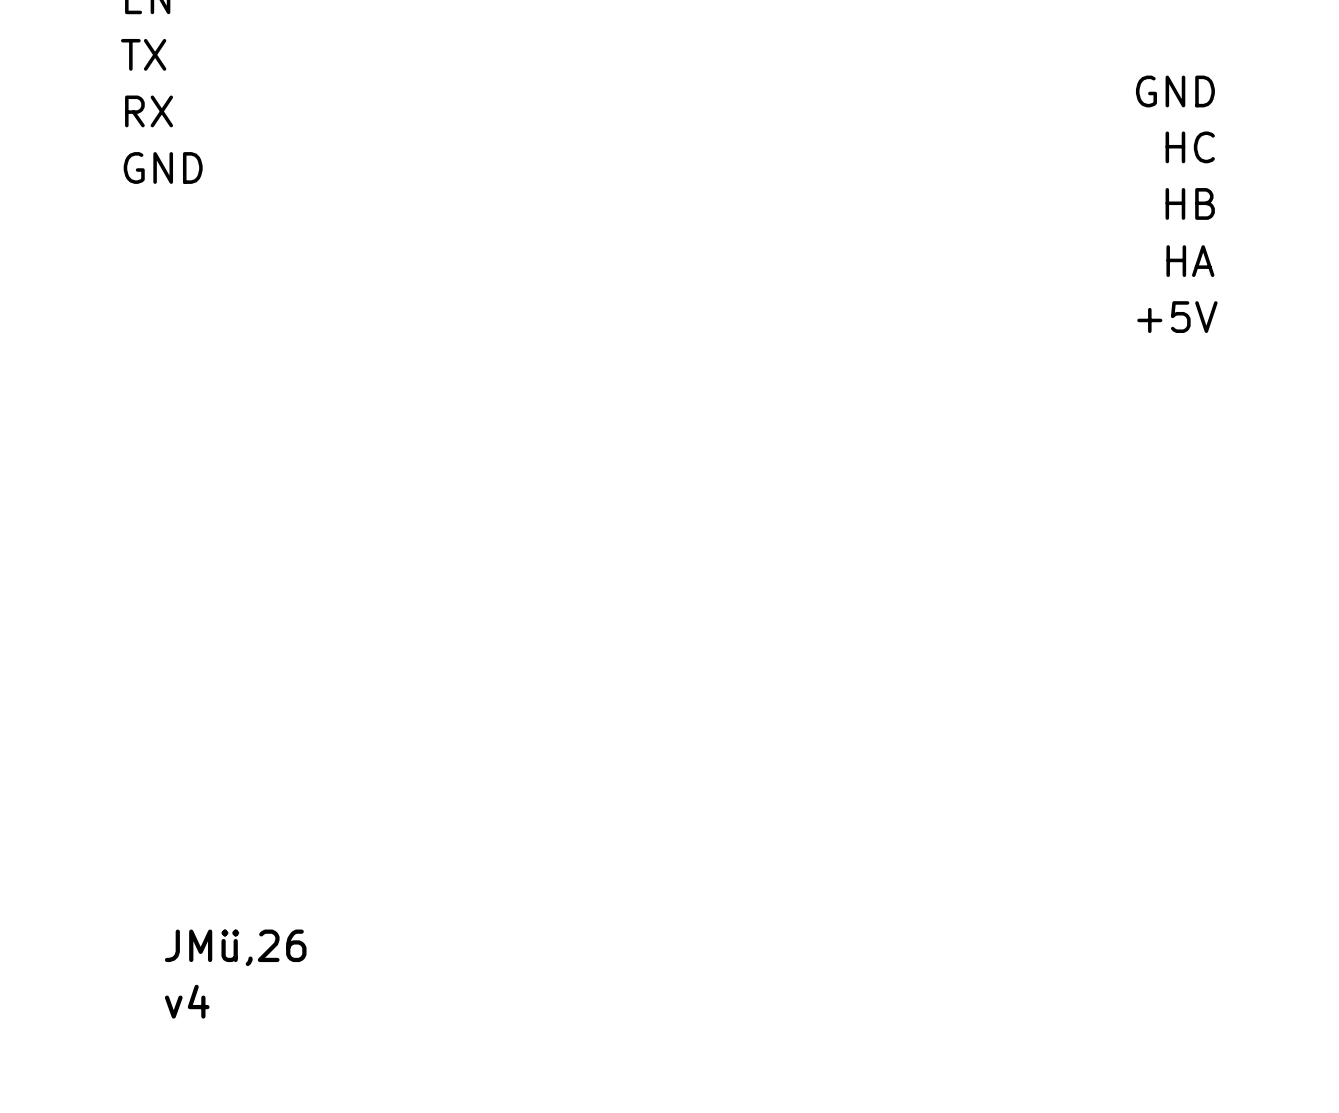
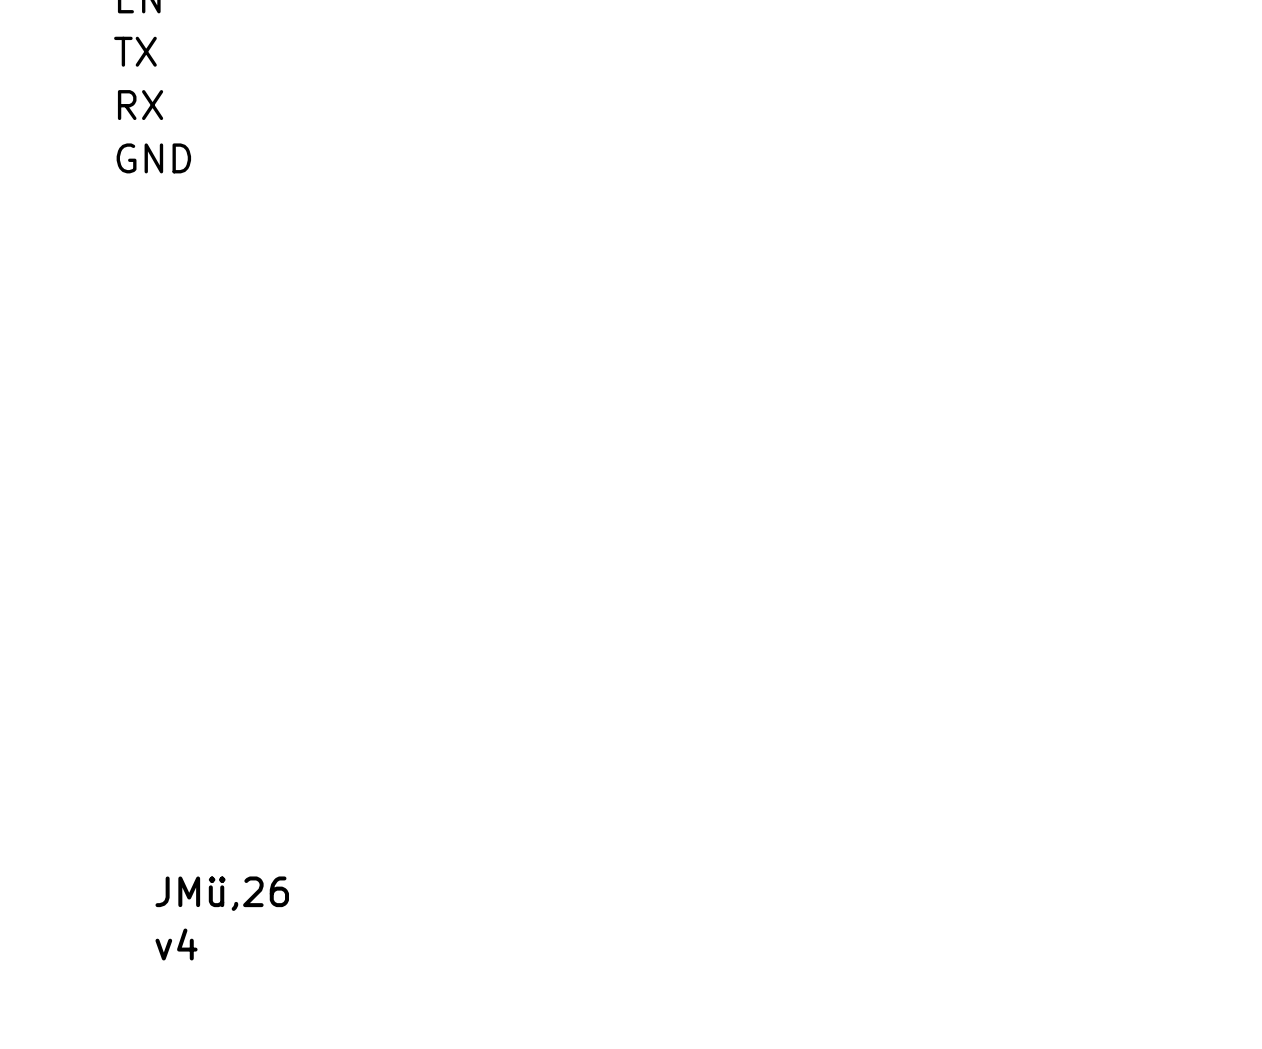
text: GND (1175, 91) -> none
text: HC (1190, 147) -> none
text: HB (1190, 203) -> none
text: HA (1190, 261) -> none
text: +5V (1177, 317) -> none

